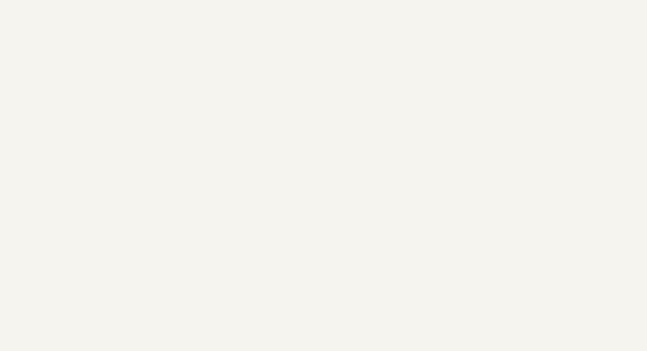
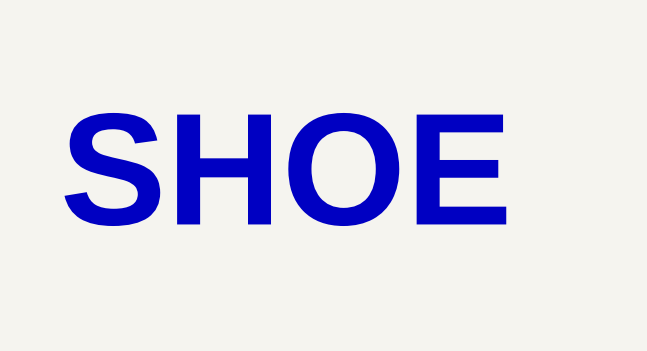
text: none -> SHOE (285, 169)

